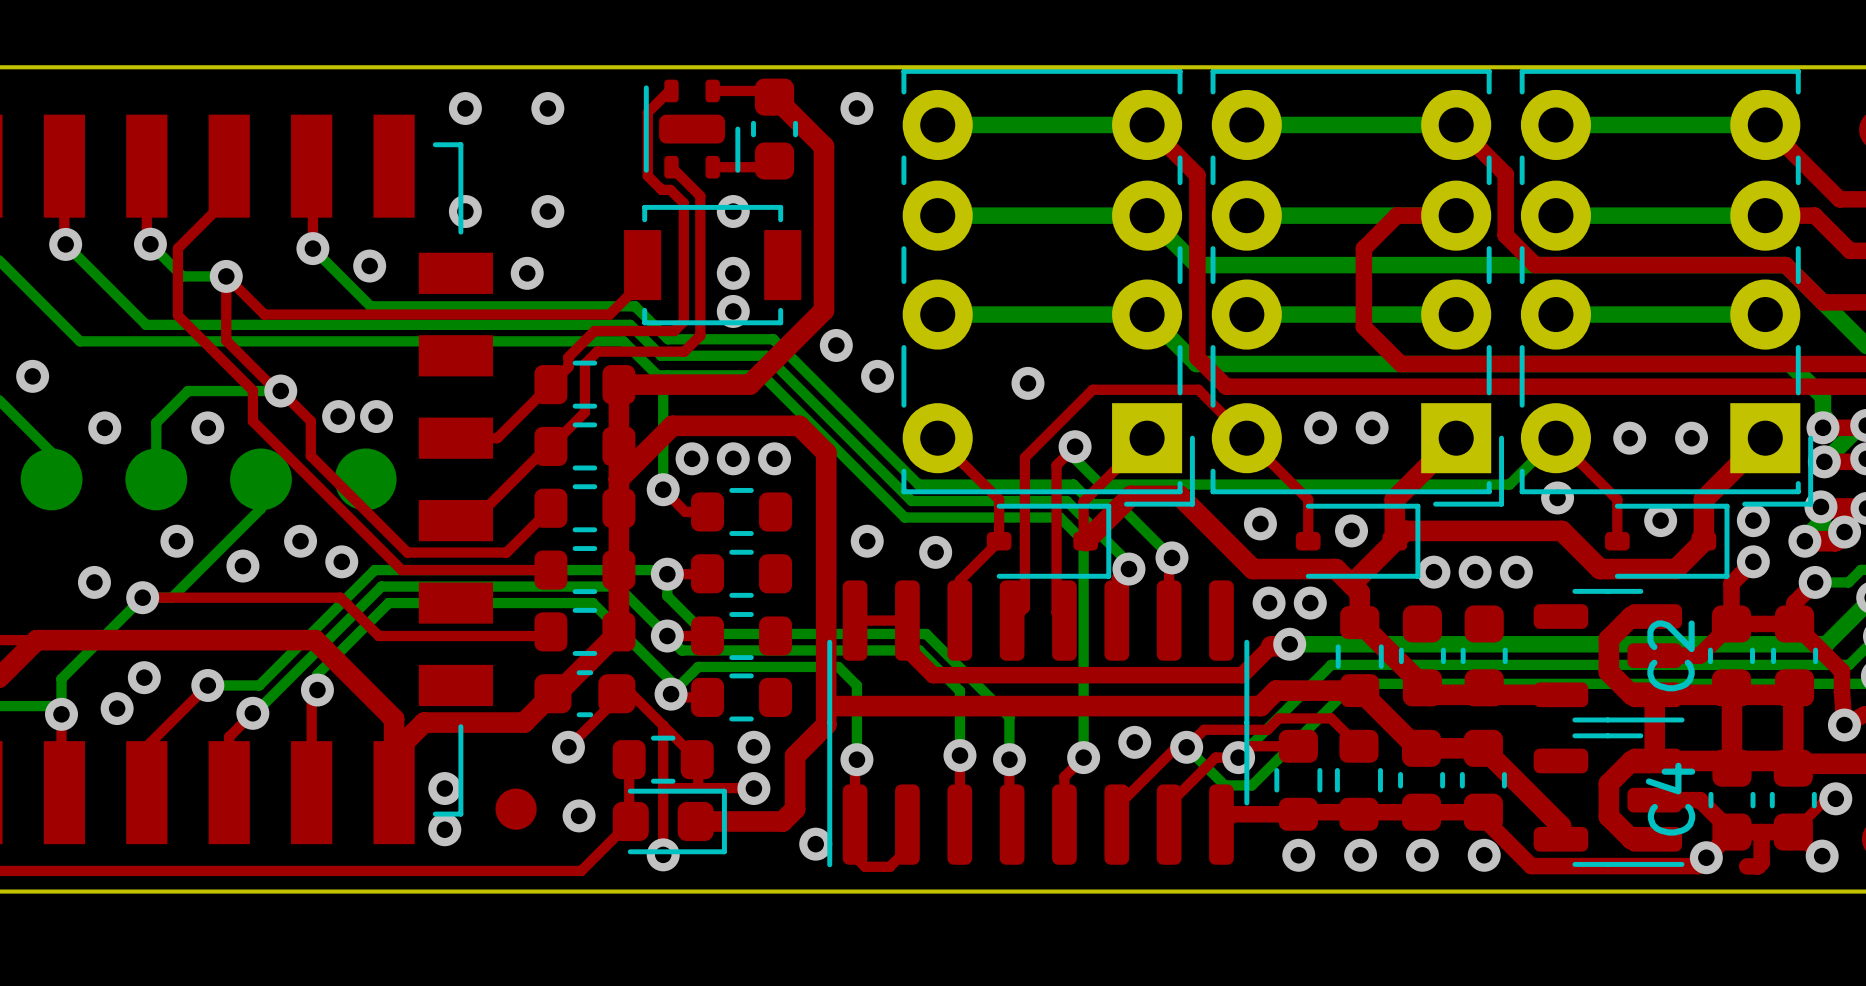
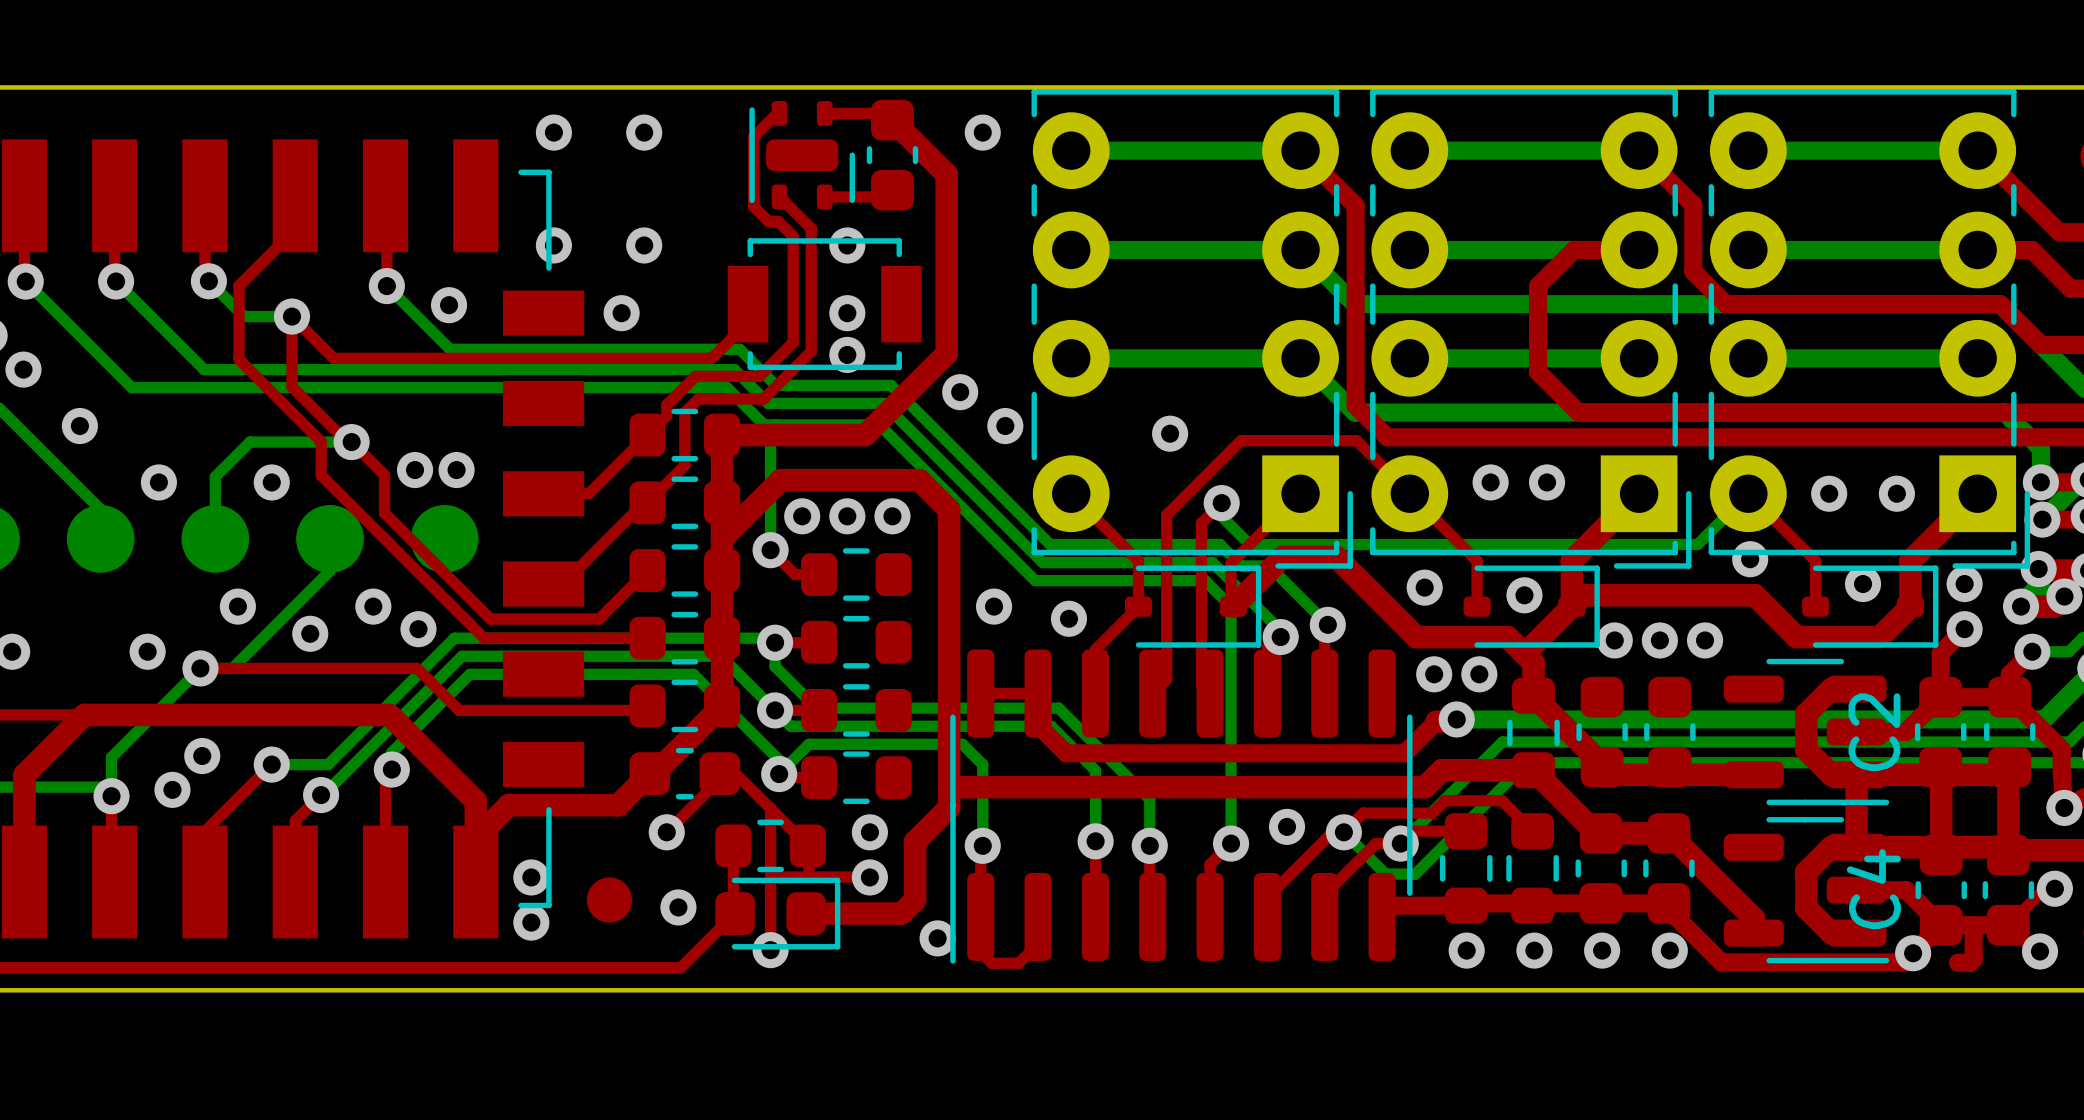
top track: (683, 300) (683, 321) (674, 331) (652, 331) -> (793, 342) (759, 376)
top track: (700, 308) (700, 335) (684, 351) (657, 351) -> (811, 351) (763, 398)

